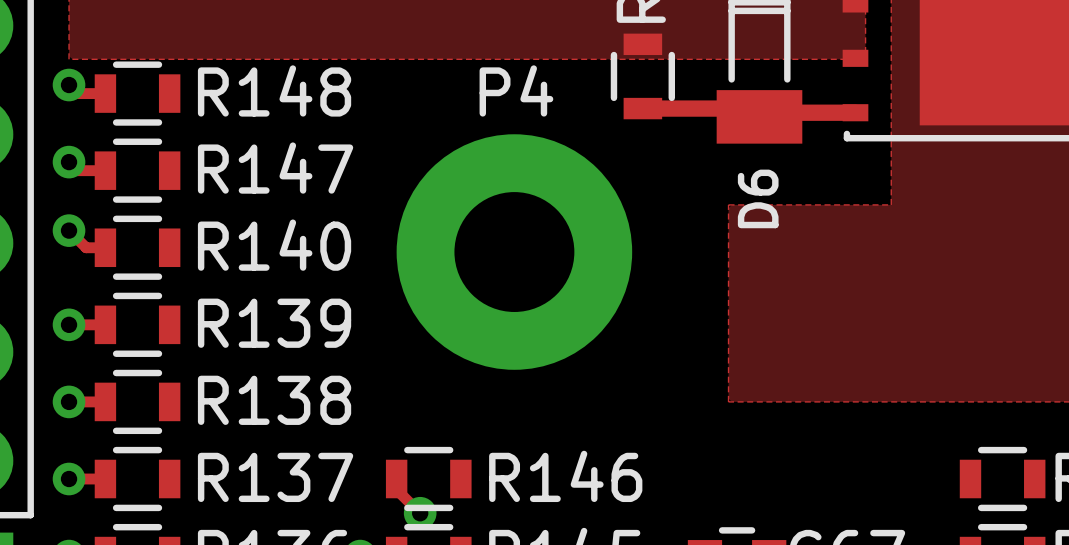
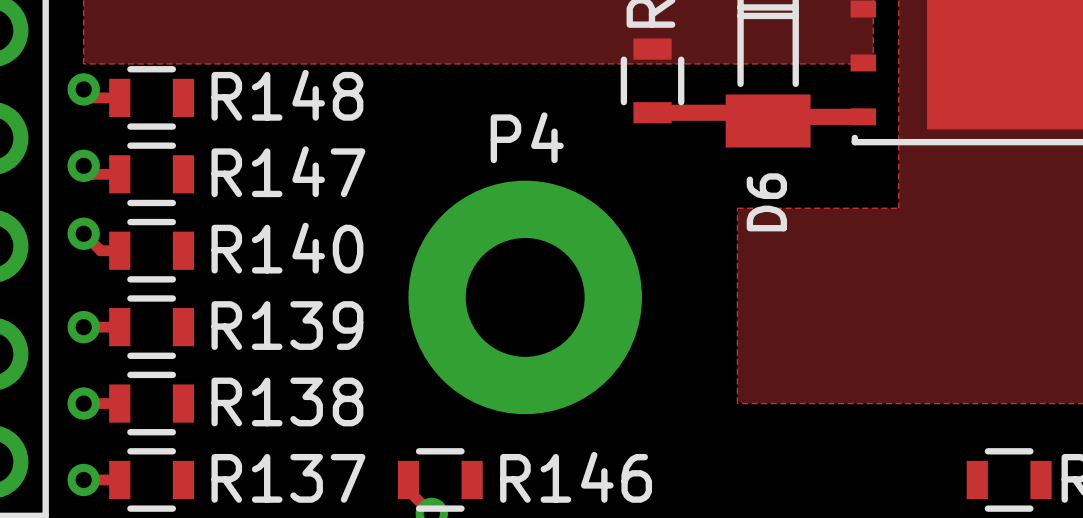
P4 position: (514, 252) -> (525, 297)

